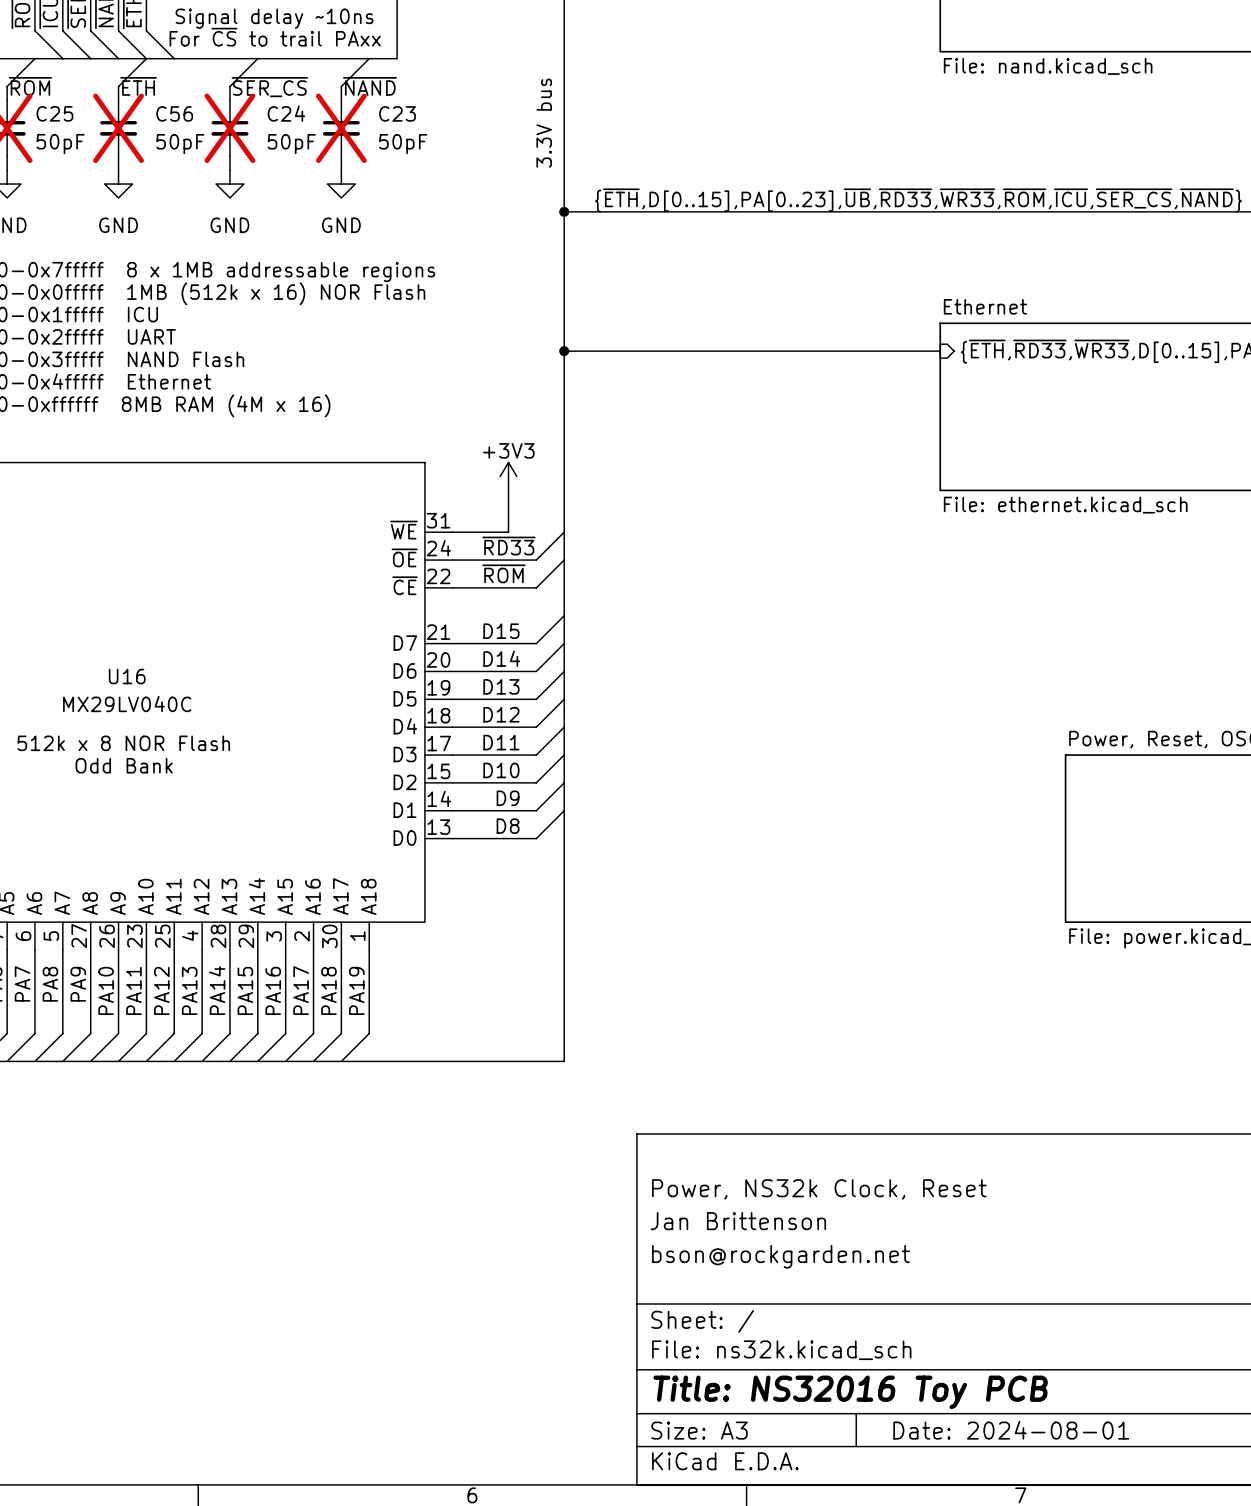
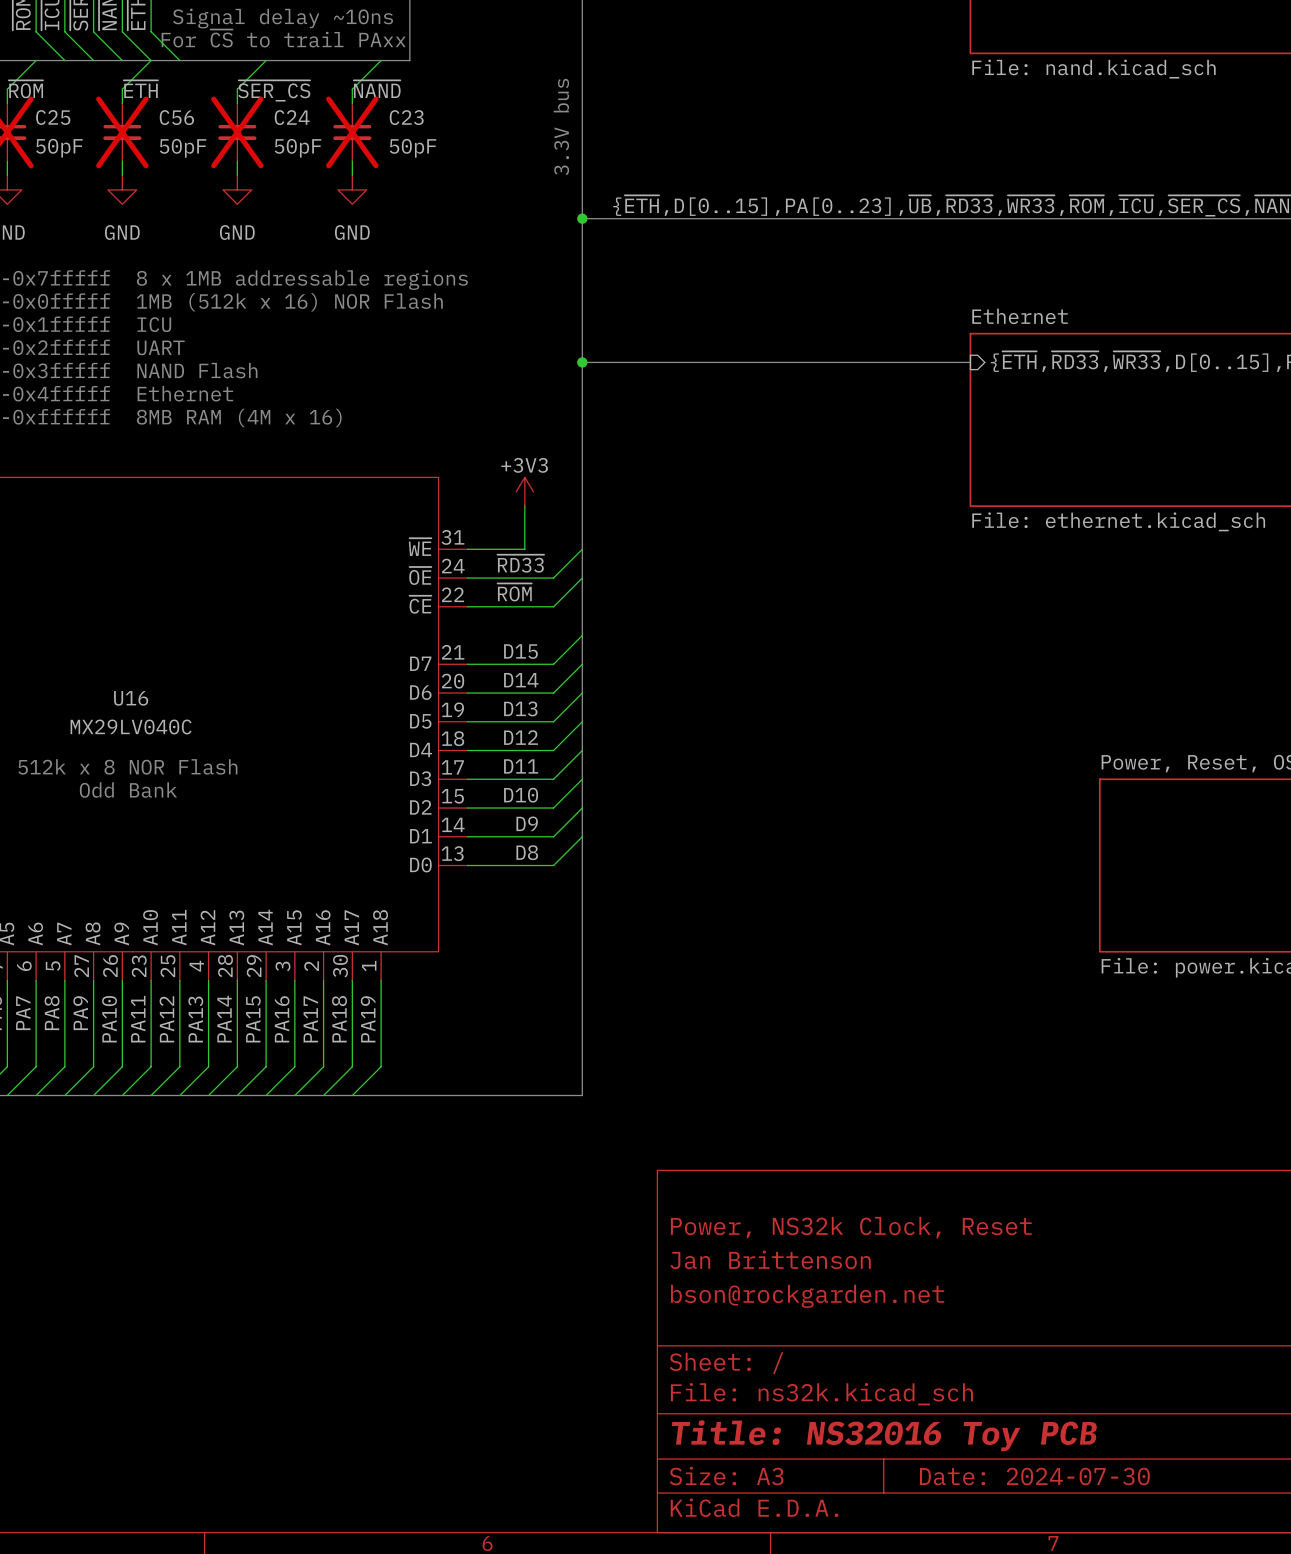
title block: Date: 2024-08-01 (1011, 1430) -> Date: 2024-07-30 (1034, 1476)

